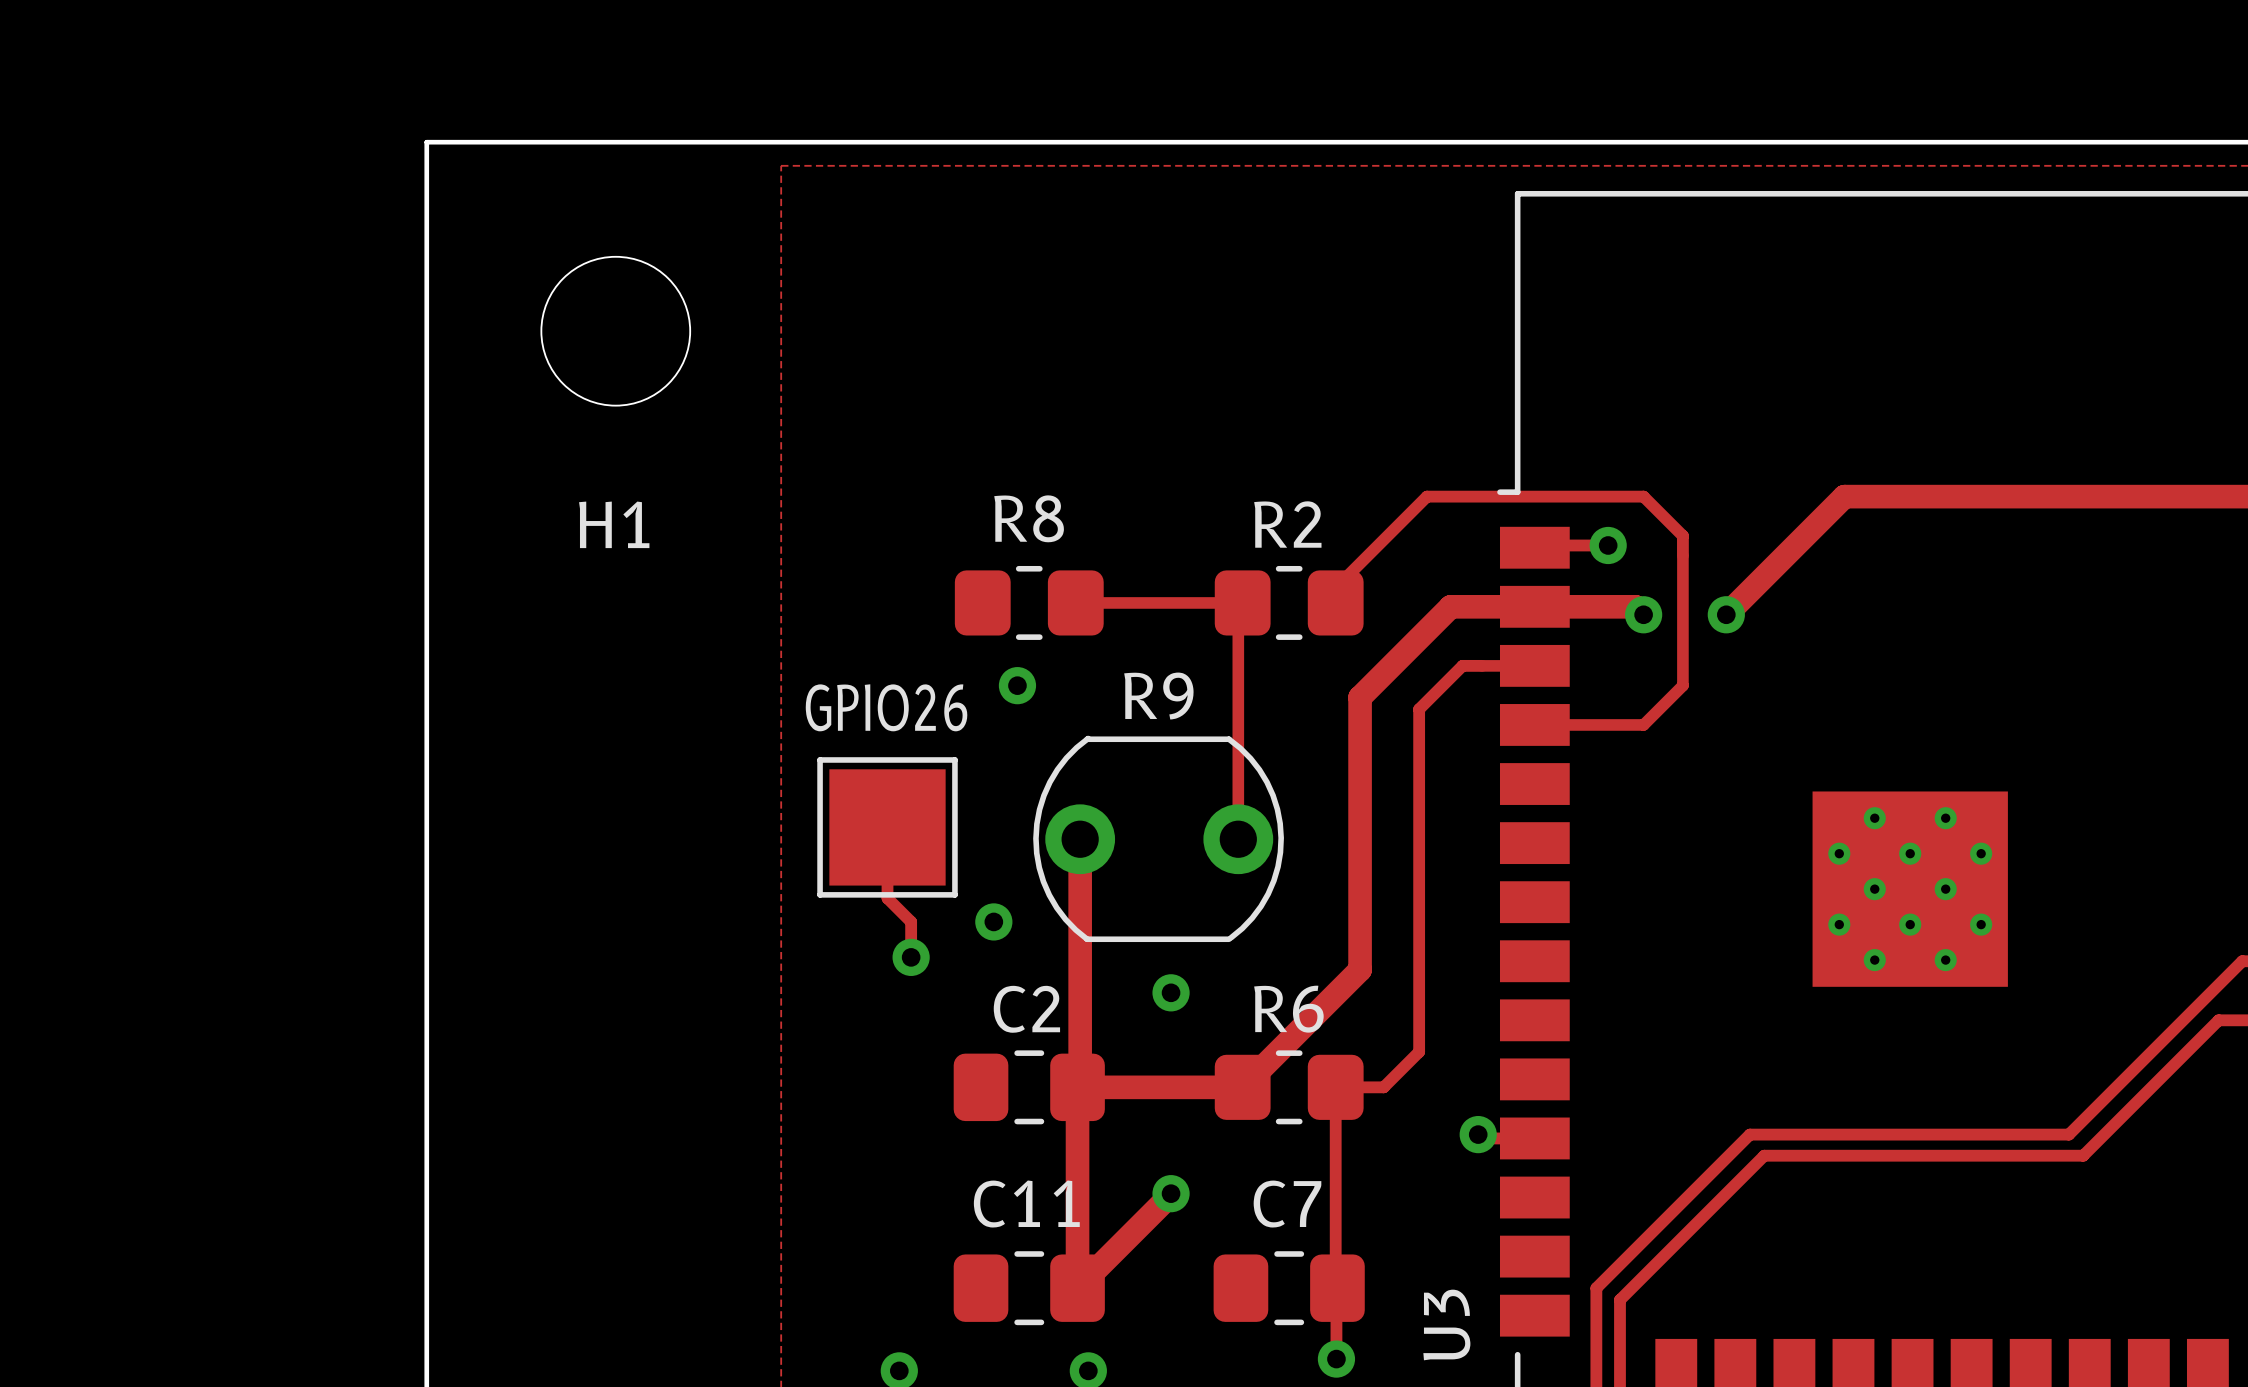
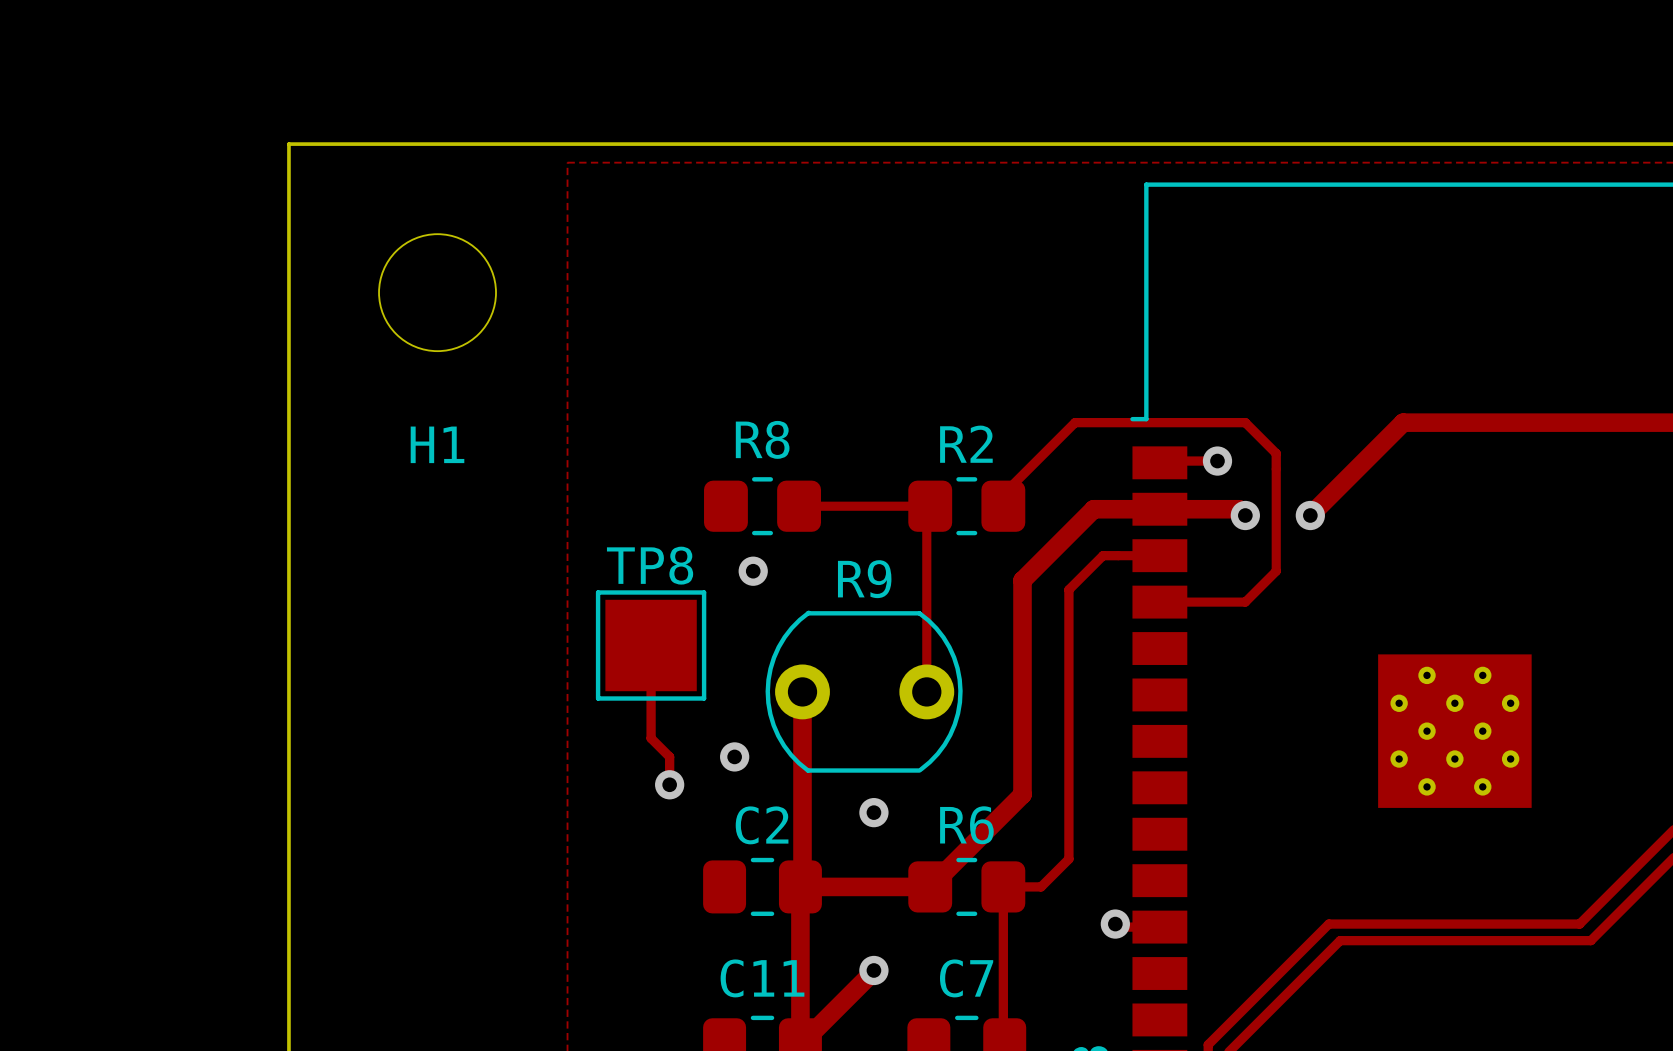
text: GPIO26 (886, 707) -> none
TP8: none -> (651, 645)
part: (887, 827) -> none

